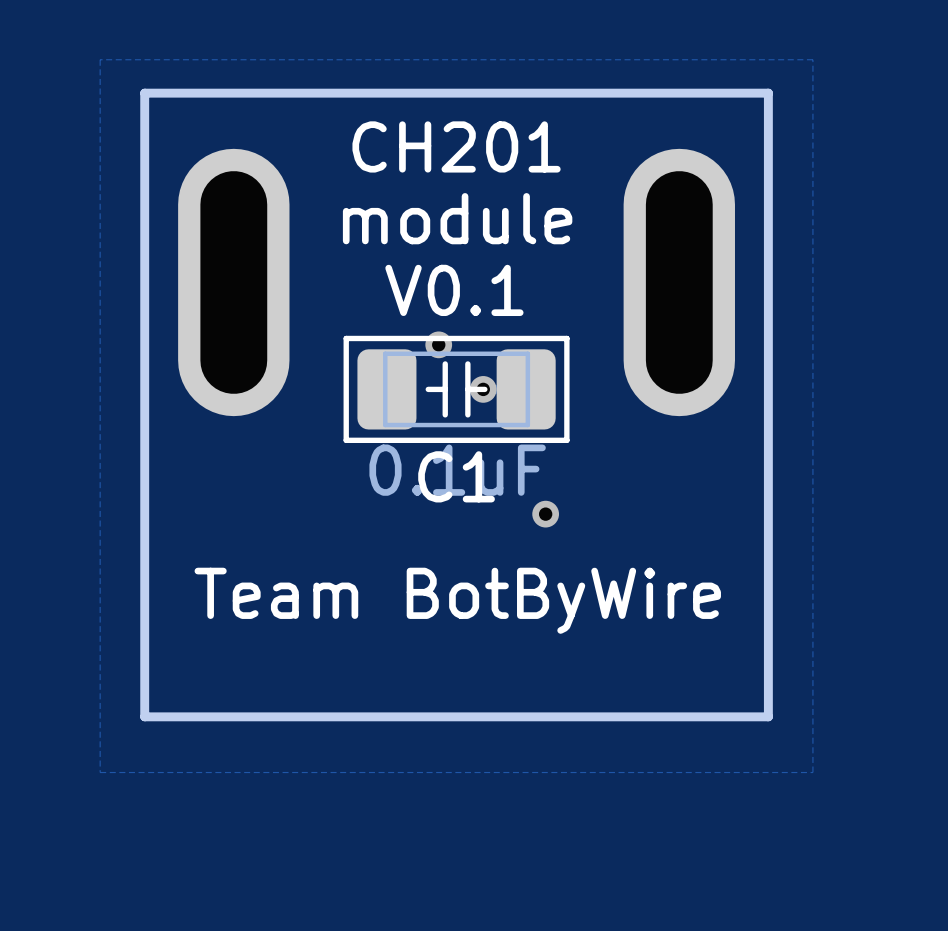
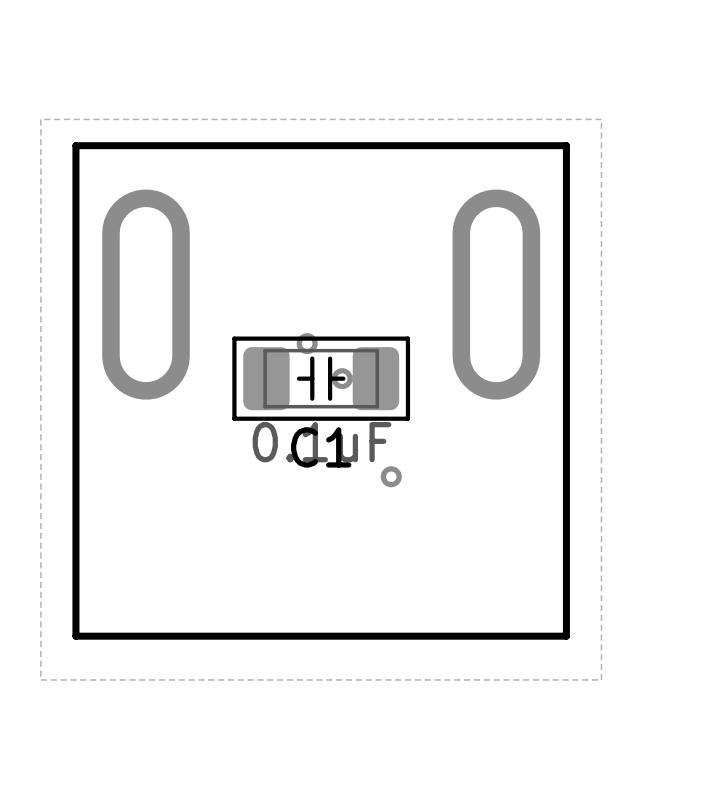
text: CH201 (456, 146) -> none
text: module (457, 218) -> none
text: V0.1 (454, 290) -> none
text: Team BotByWire (457, 600) -> none

